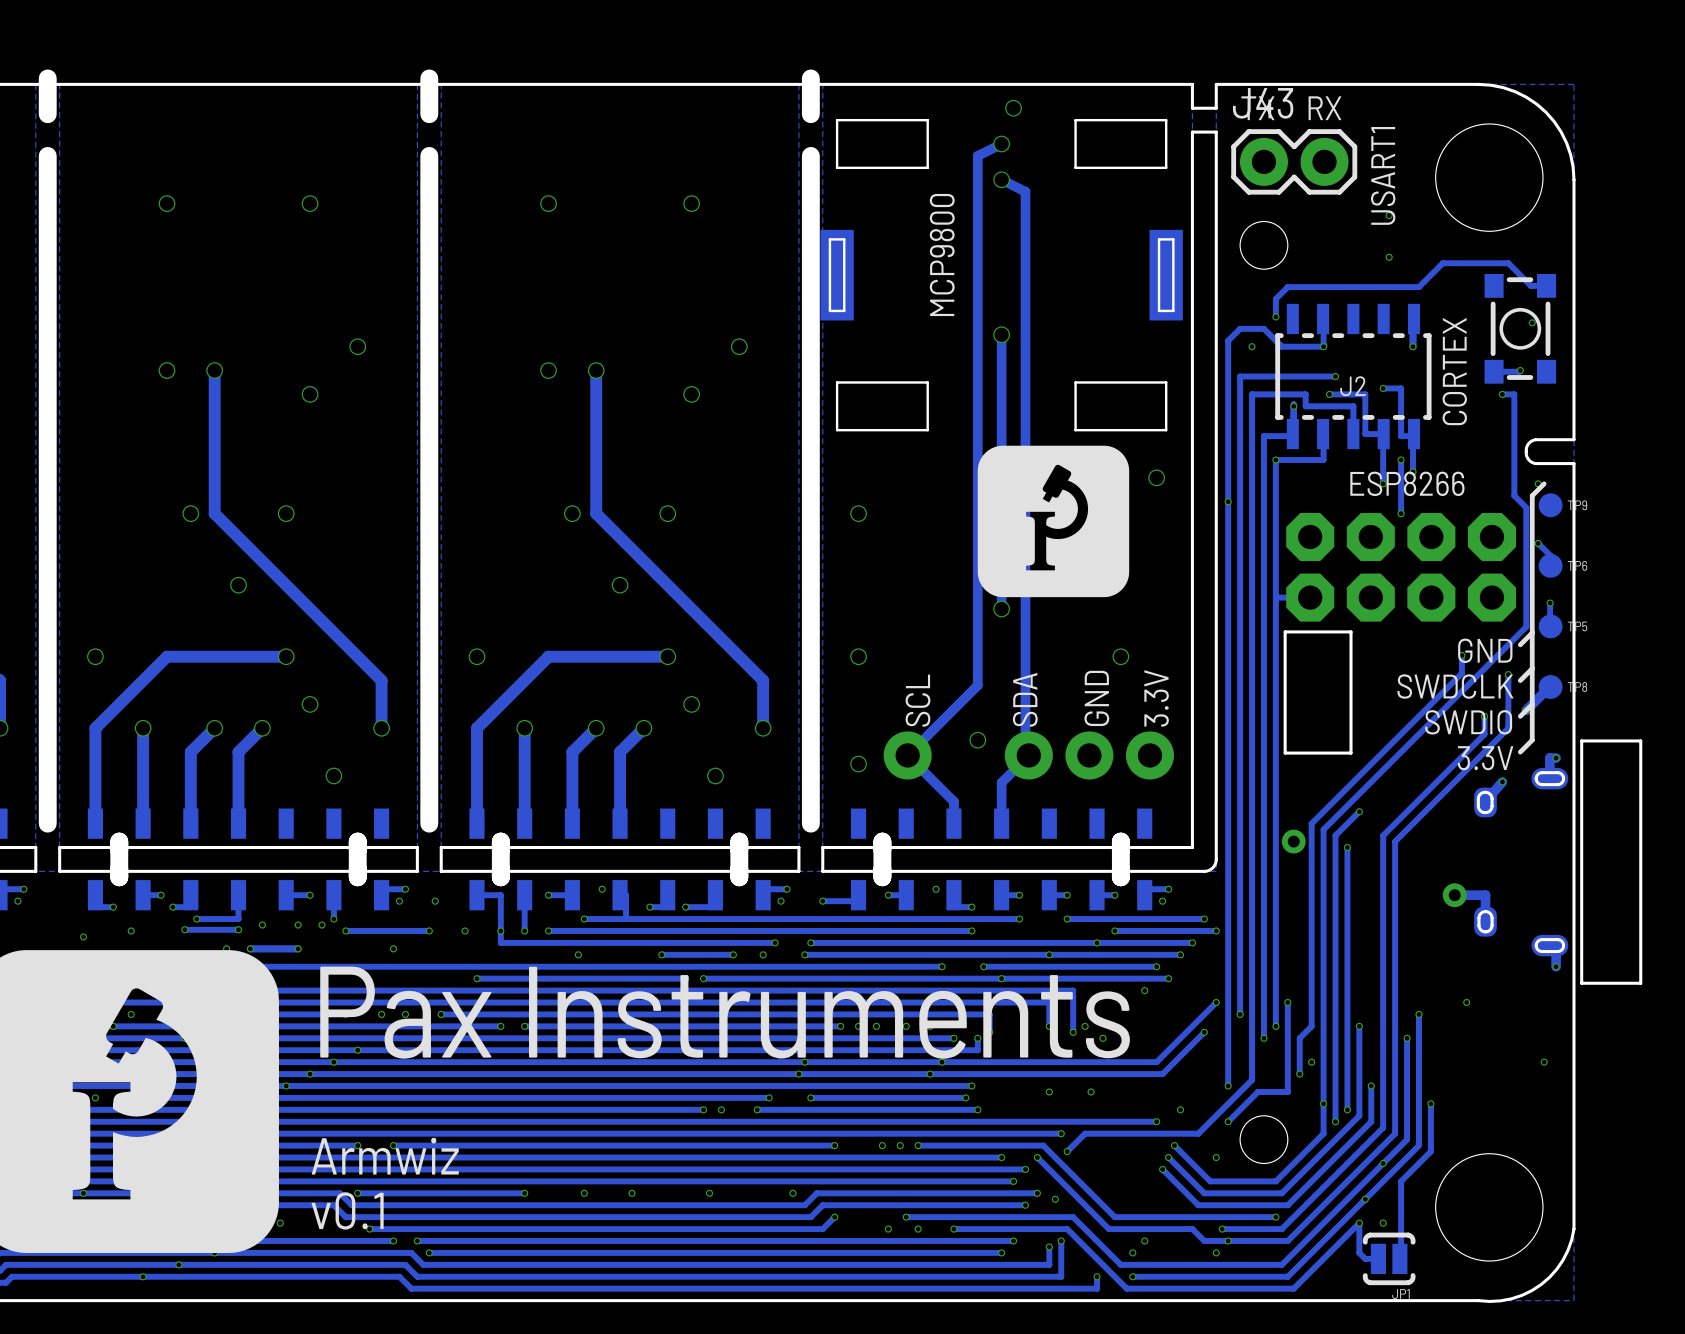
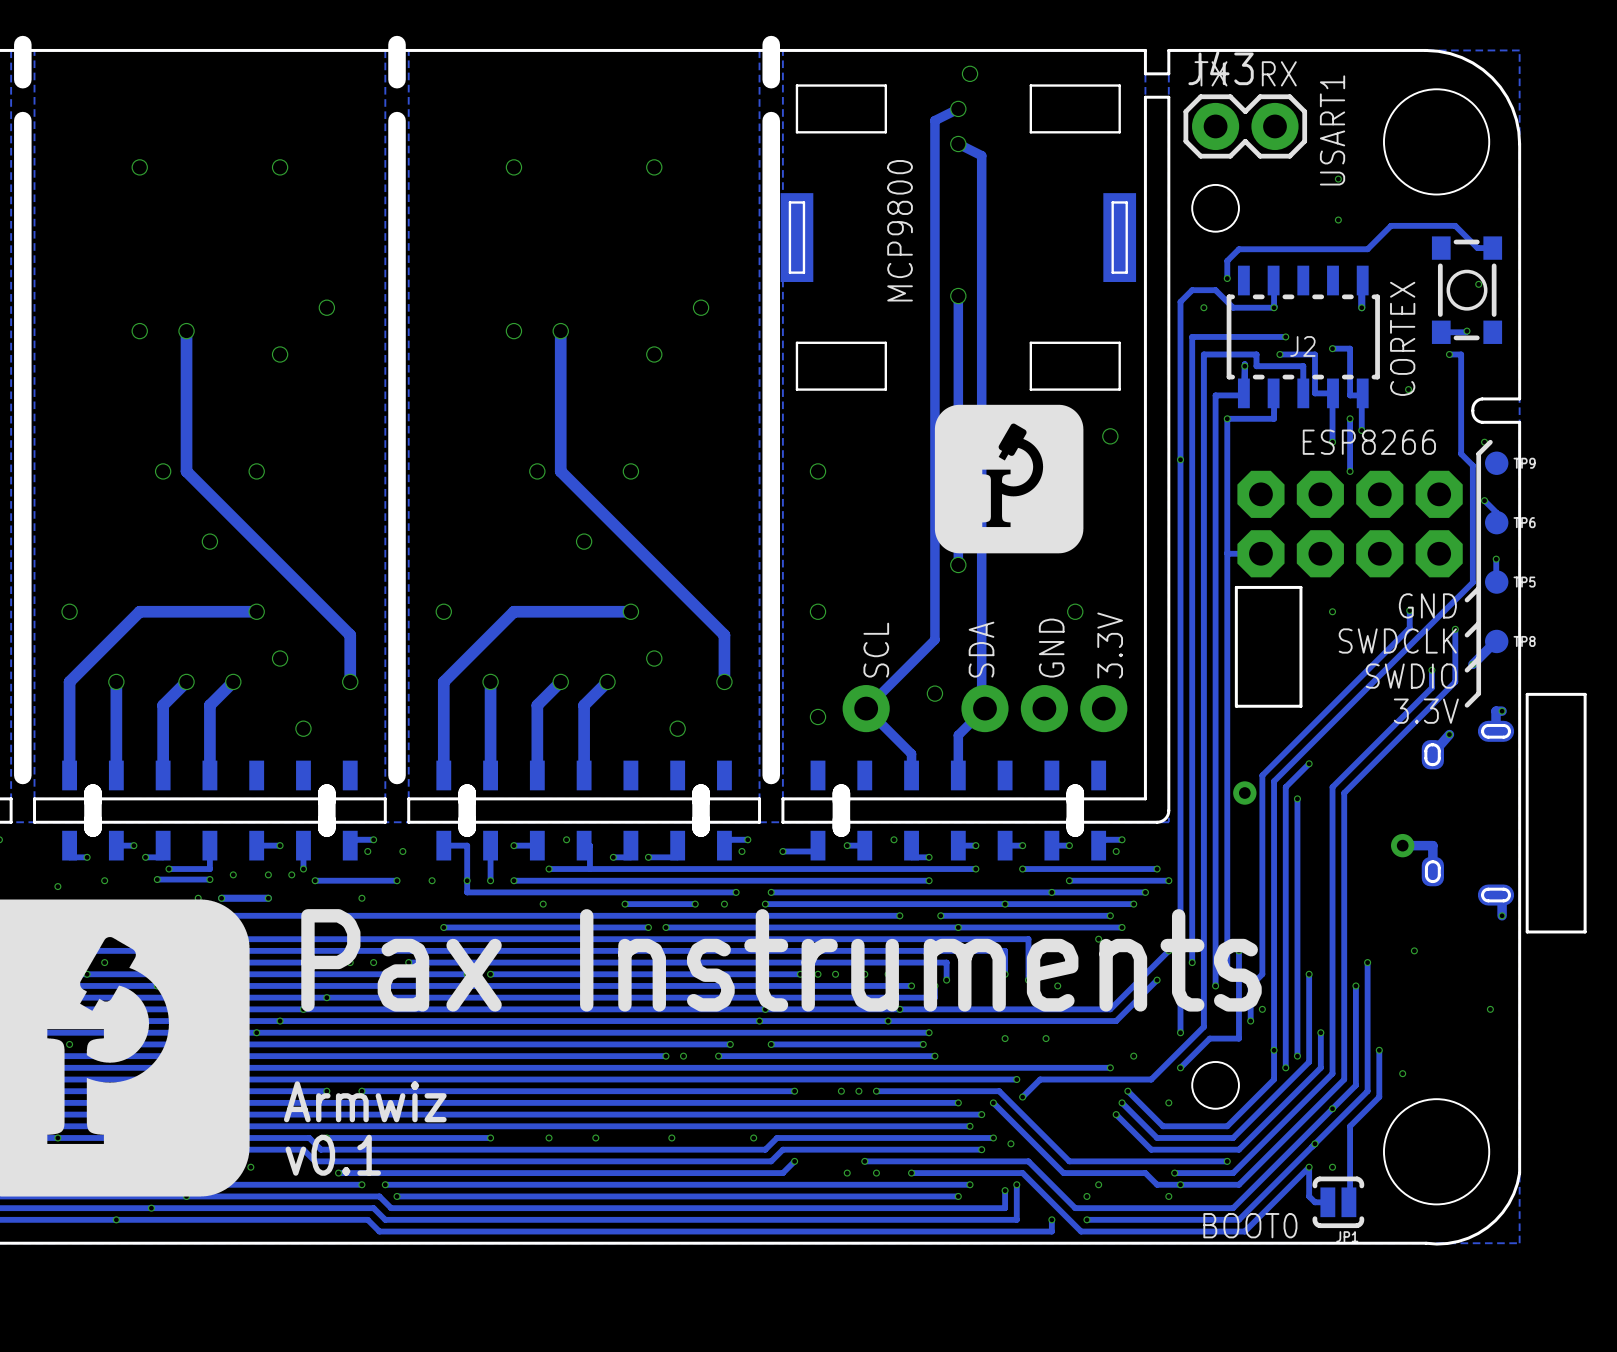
via: none -> (1408, 389)
via: none -> (1332, 611)
via: none -> (1402, 1073)
text: none -> BOOT0 (1250, 1225)

